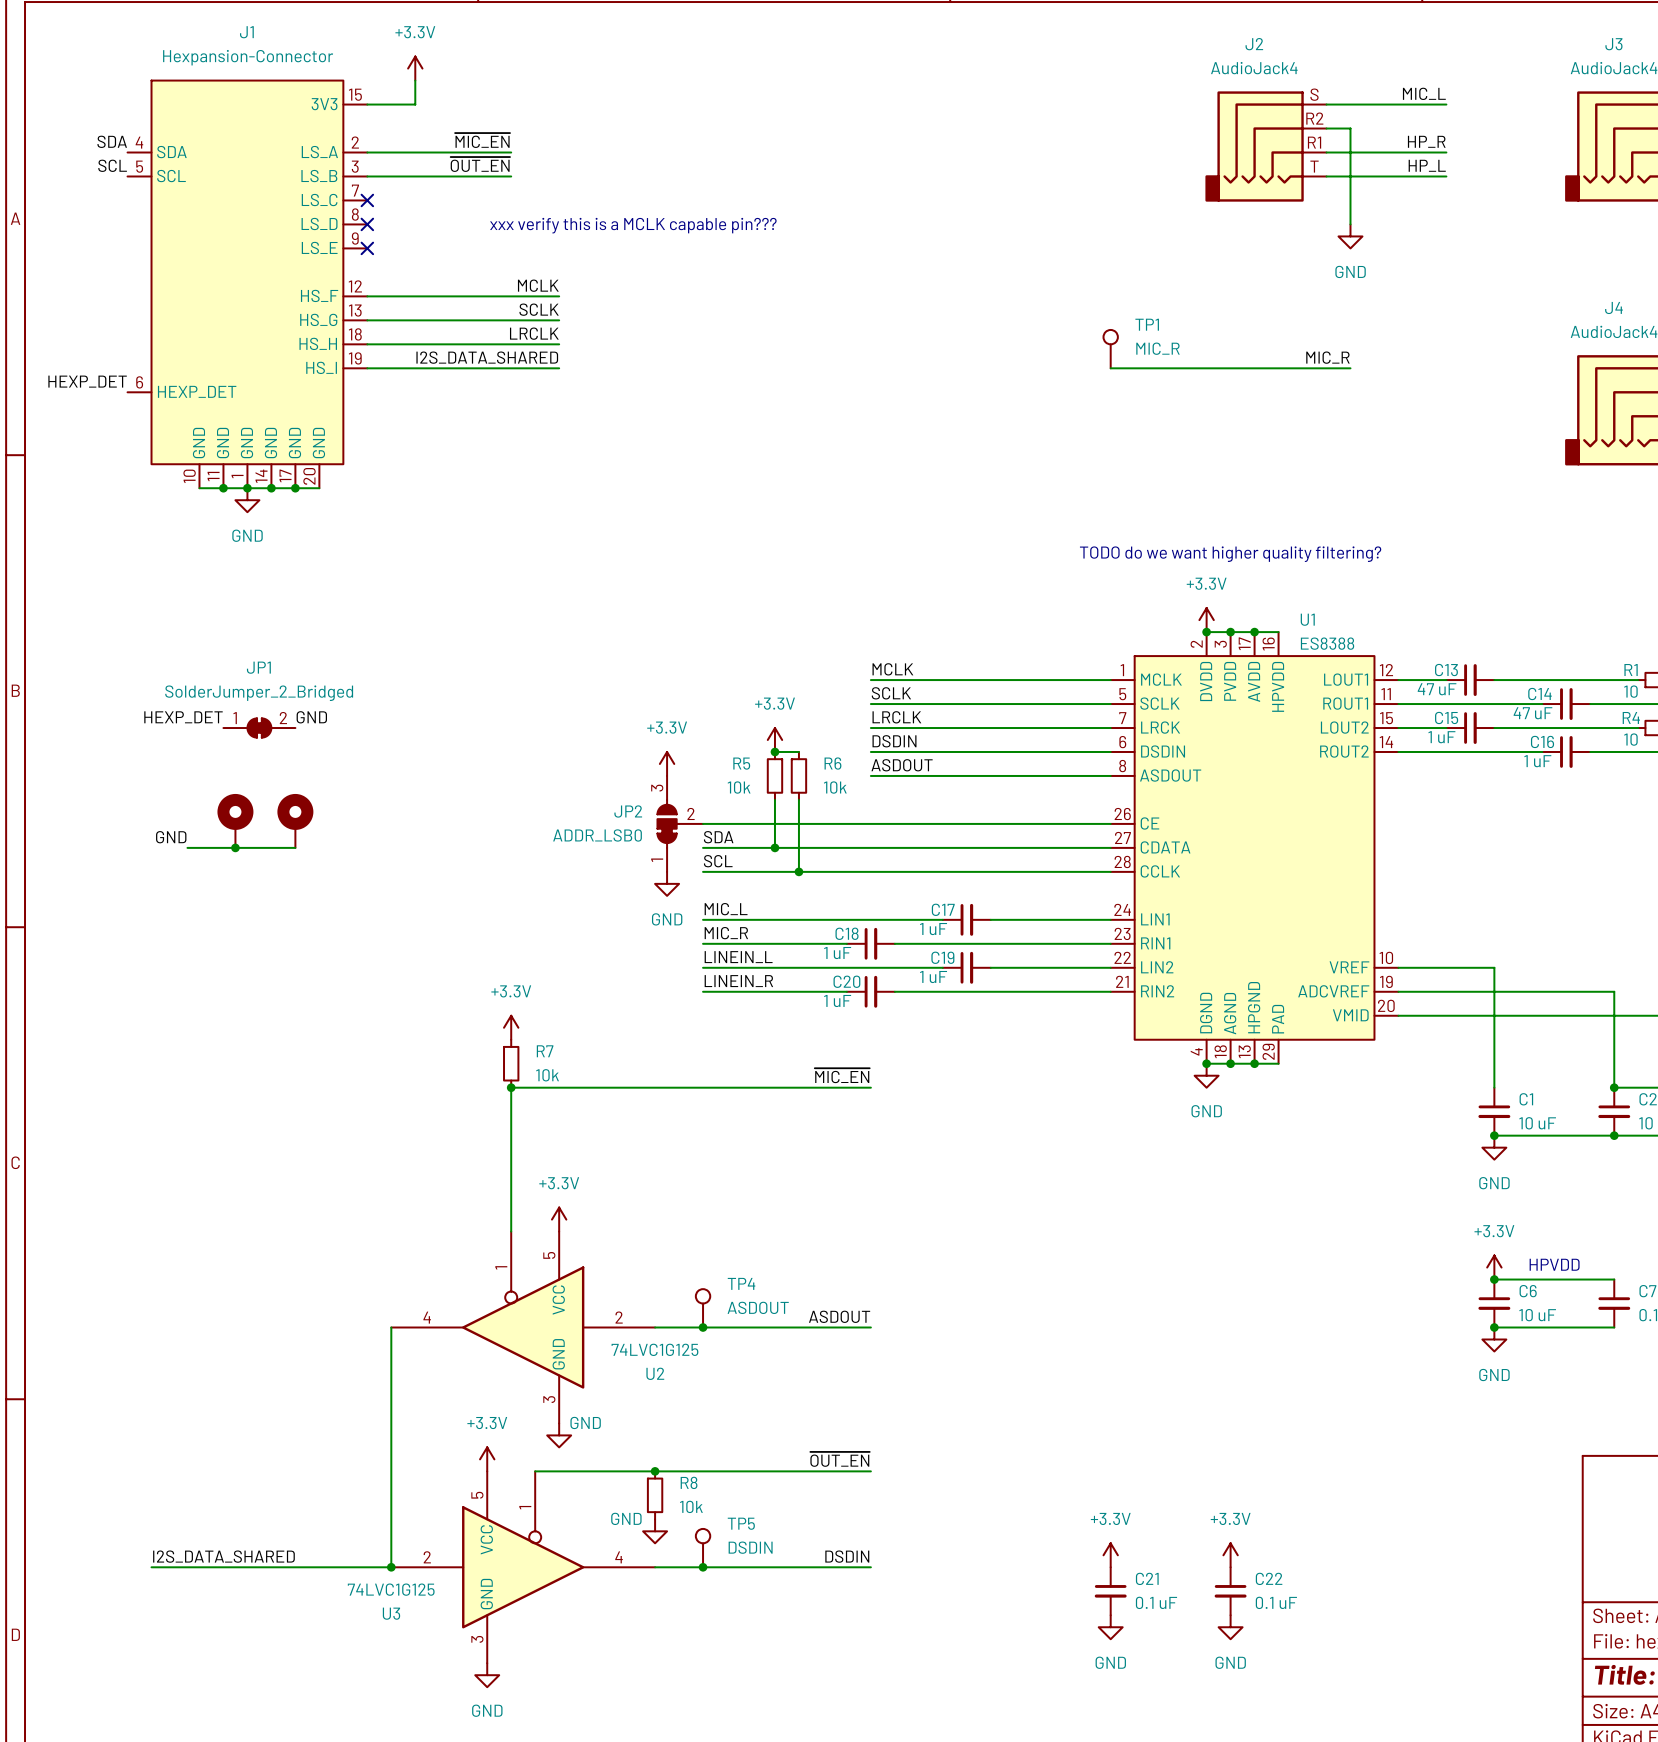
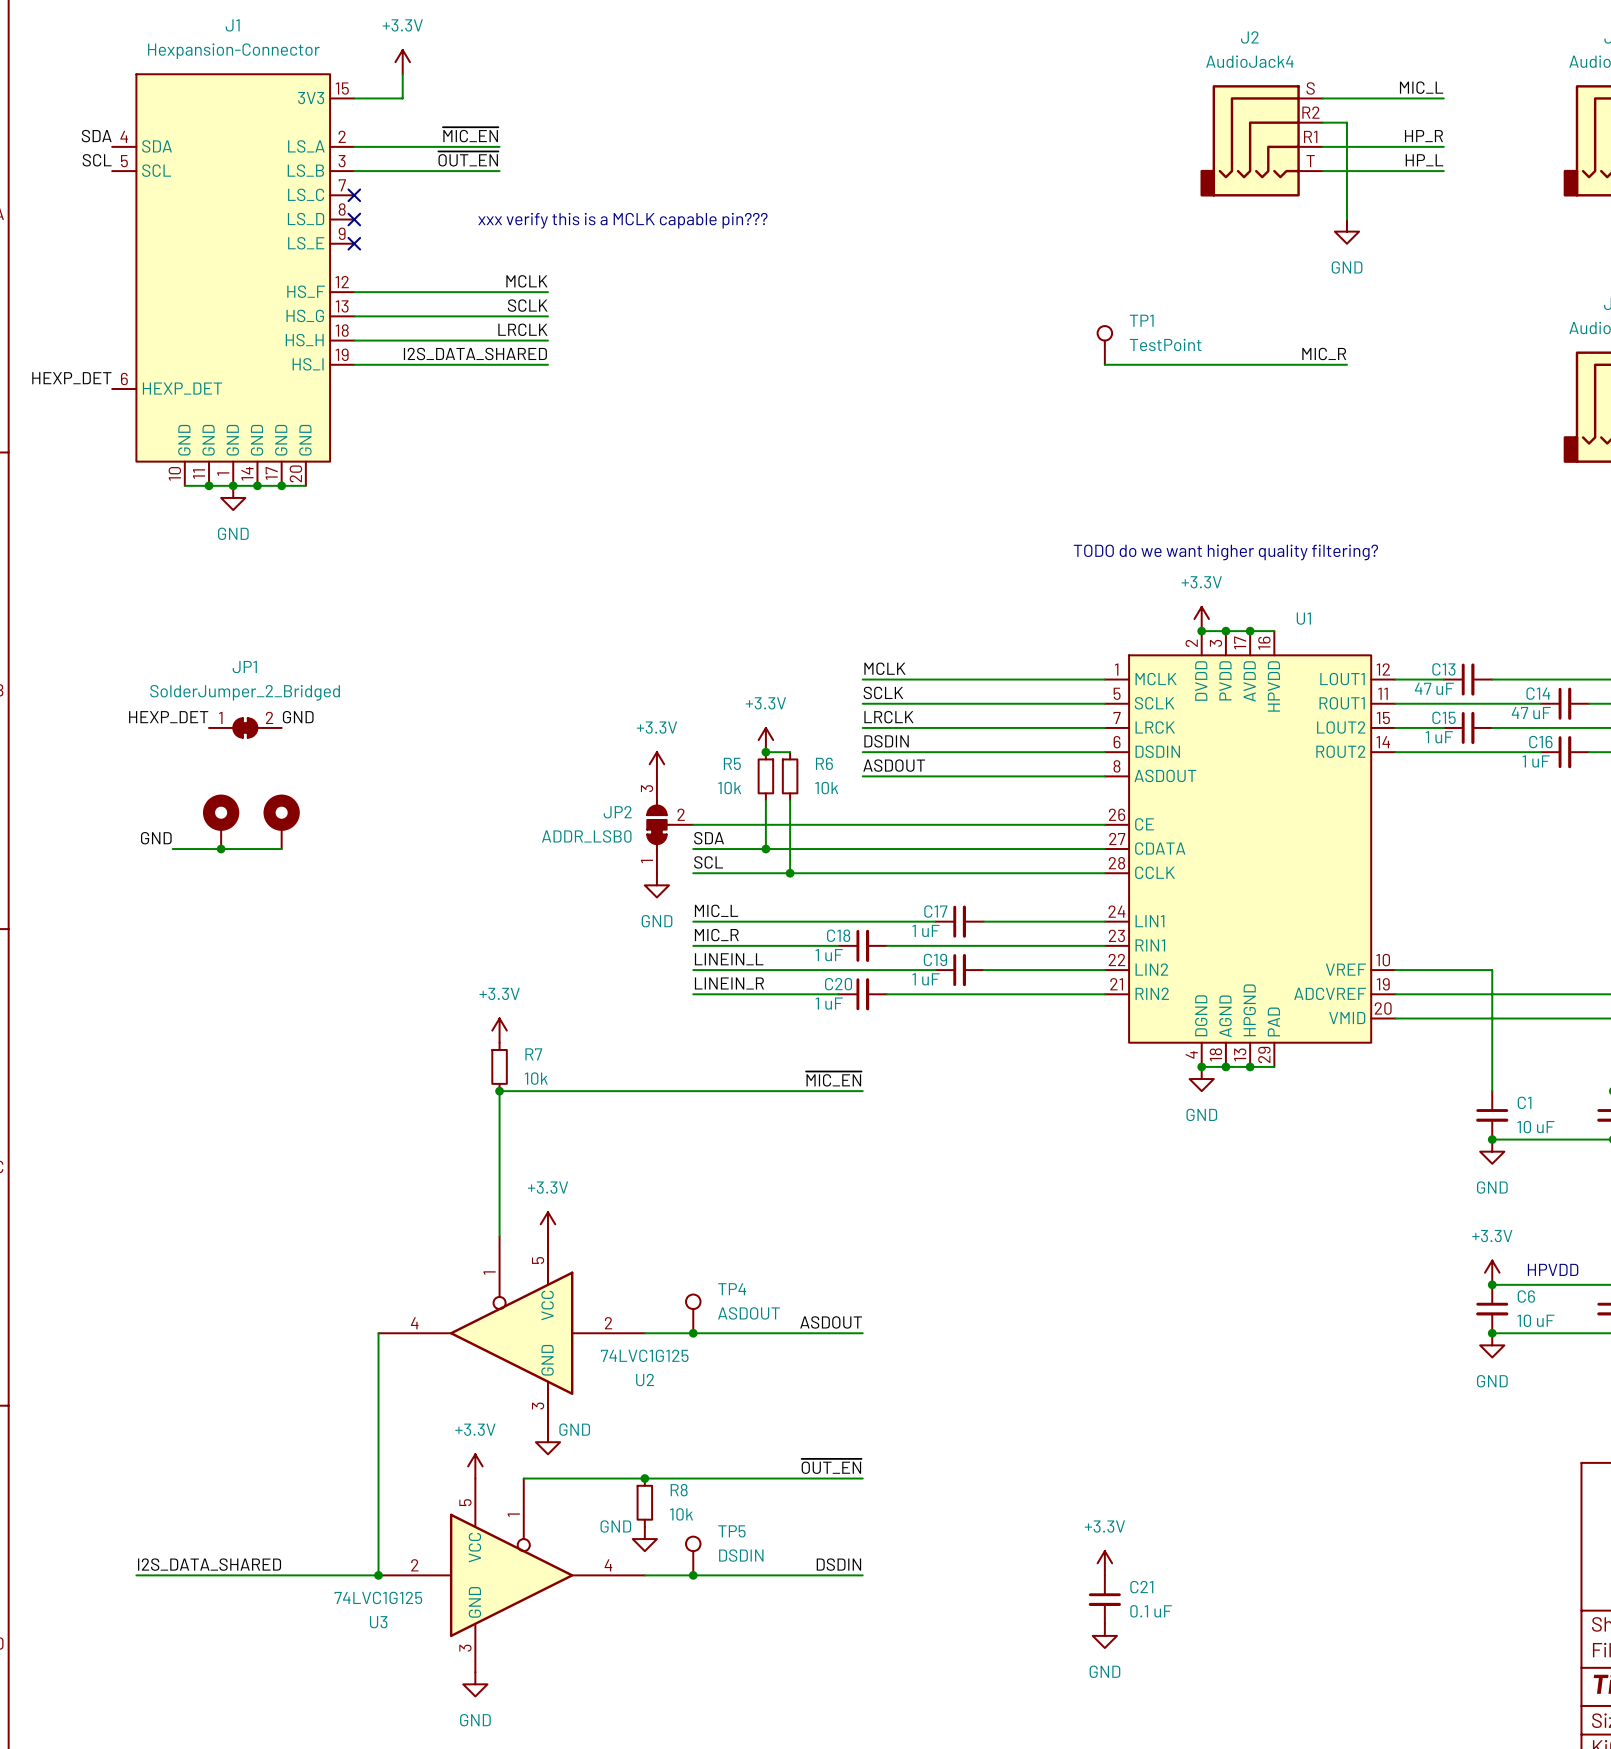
TP1 value: MIC_R (1157, 348) -> TestPoint (1165, 344)
U1 value: ES8388 (1327, 643) -> none
power symbol: +3.3V (1230, 1555) -> none
C22: 0.1 uF (1230, 1591) -> none
power symbol: GND (1230, 1627) -> none

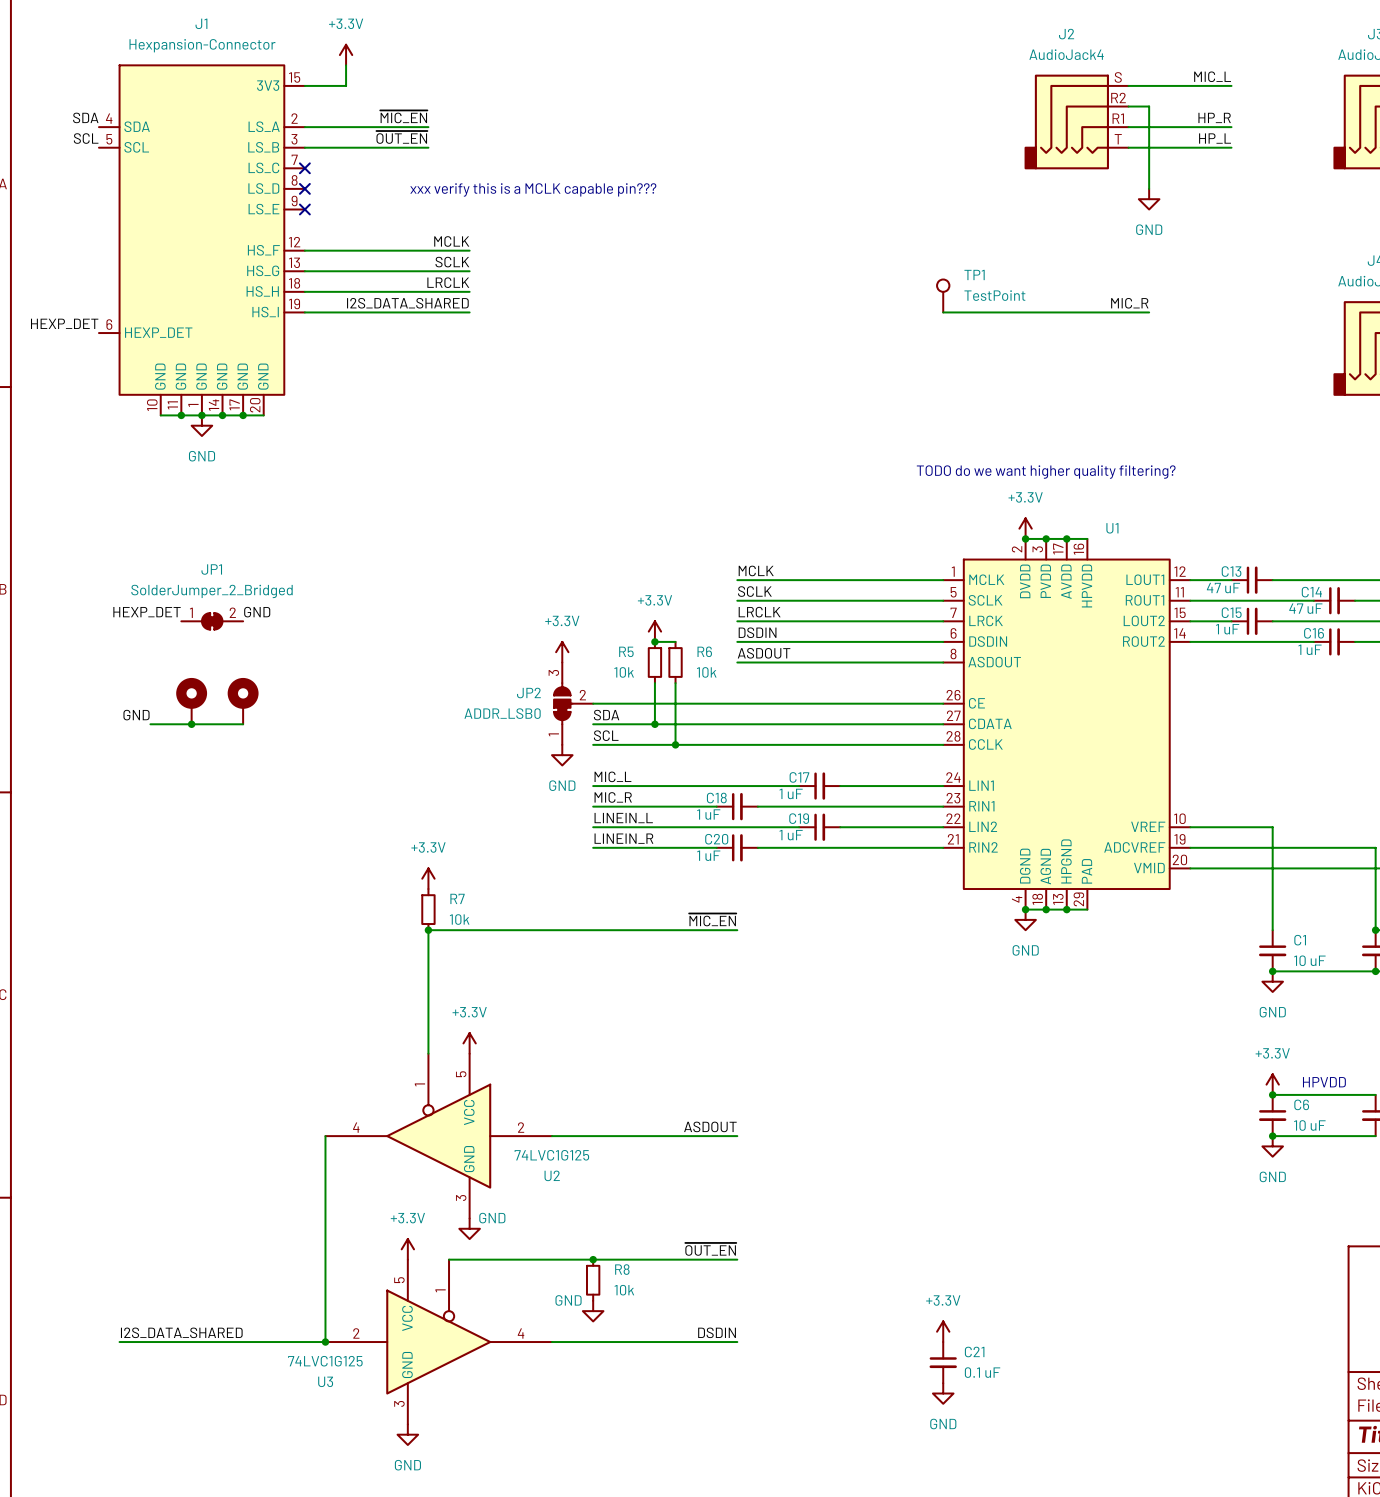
TP4: ASDOUT (693, 1313) -> none
junction: (693, 1333) -> none
junction: (644, 1478) -> none
junction: none -> (593, 1259)
R8 position: (644, 1502) -> (593, 1280)
power symbol position: GND (644, 1539) -> GND (593, 1311)
TP5: DSDIN (693, 1556) -> none
junction: (693, 1575) -> none

